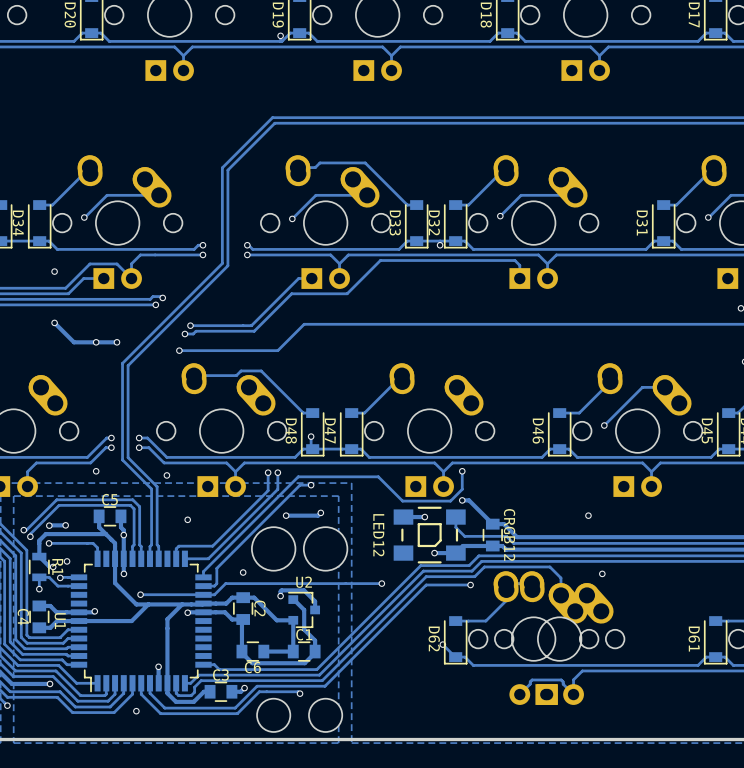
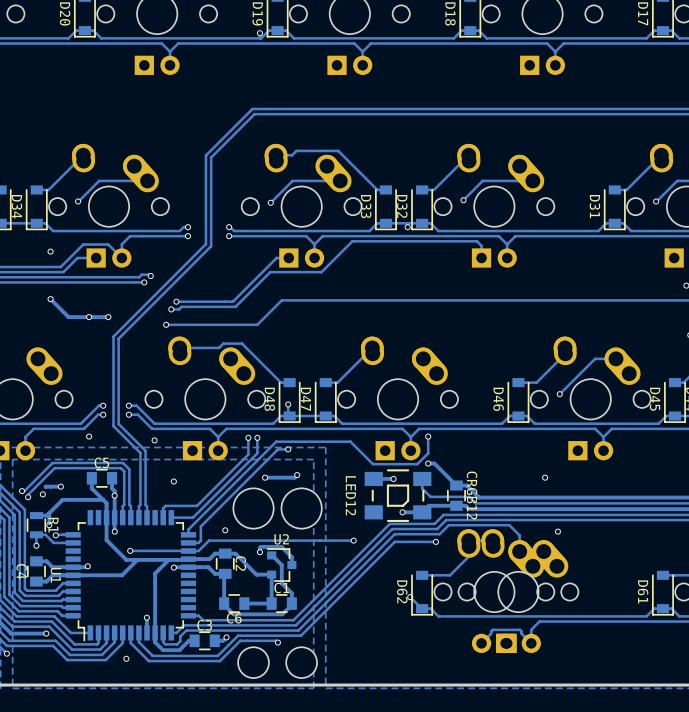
via: (49, 525) -> none
via: none -> (42, 494)
track: (105, 534) (45, 534) (39, 540) (39, 556) (49, 566) (53, 566) -> (49, 513) (49, 525)
track: none -> (103, 499) (62, 499) (46, 515) (36, 515)
track: (49, 543) (93, 543) (97, 547) (97, 558) -> none
via: (49, 543) -> none
via: (67, 561) -> none

